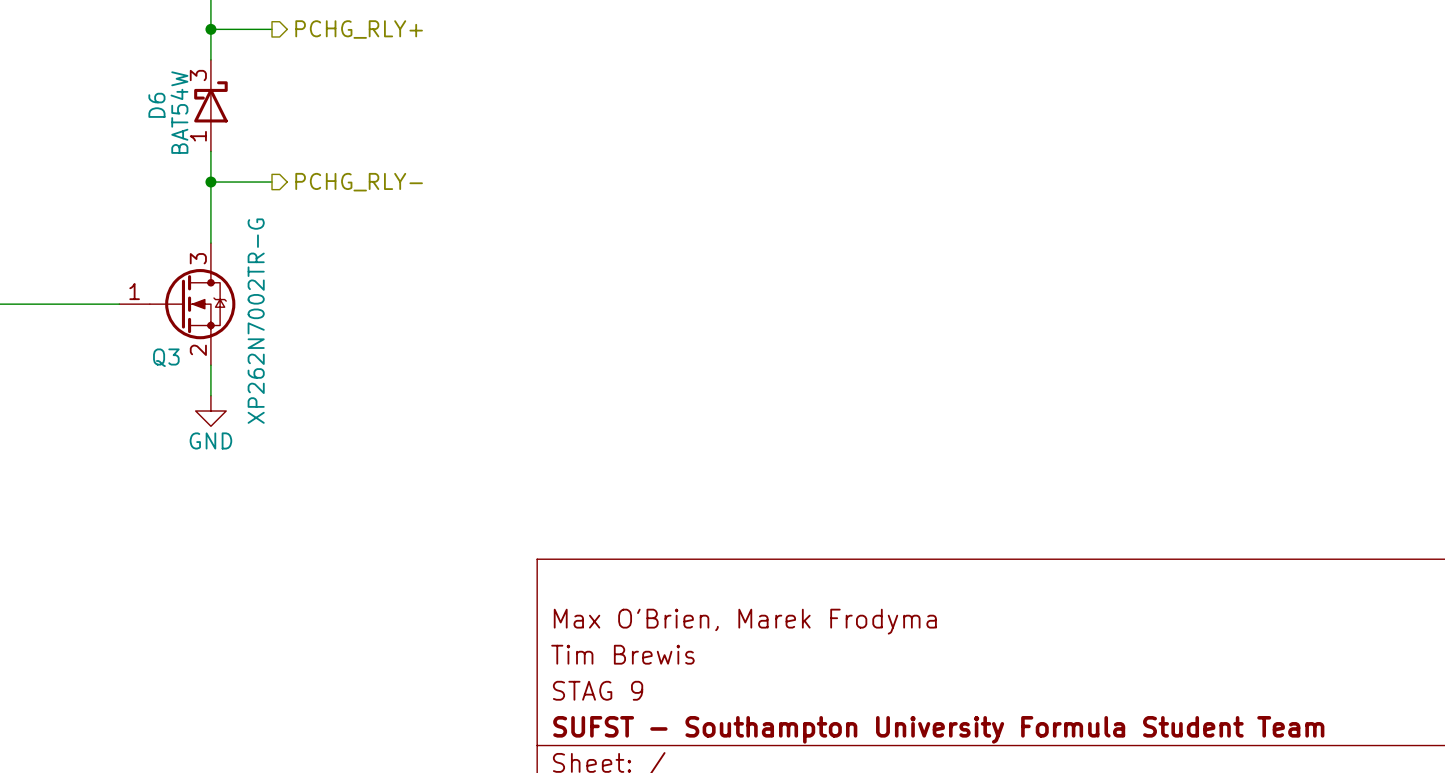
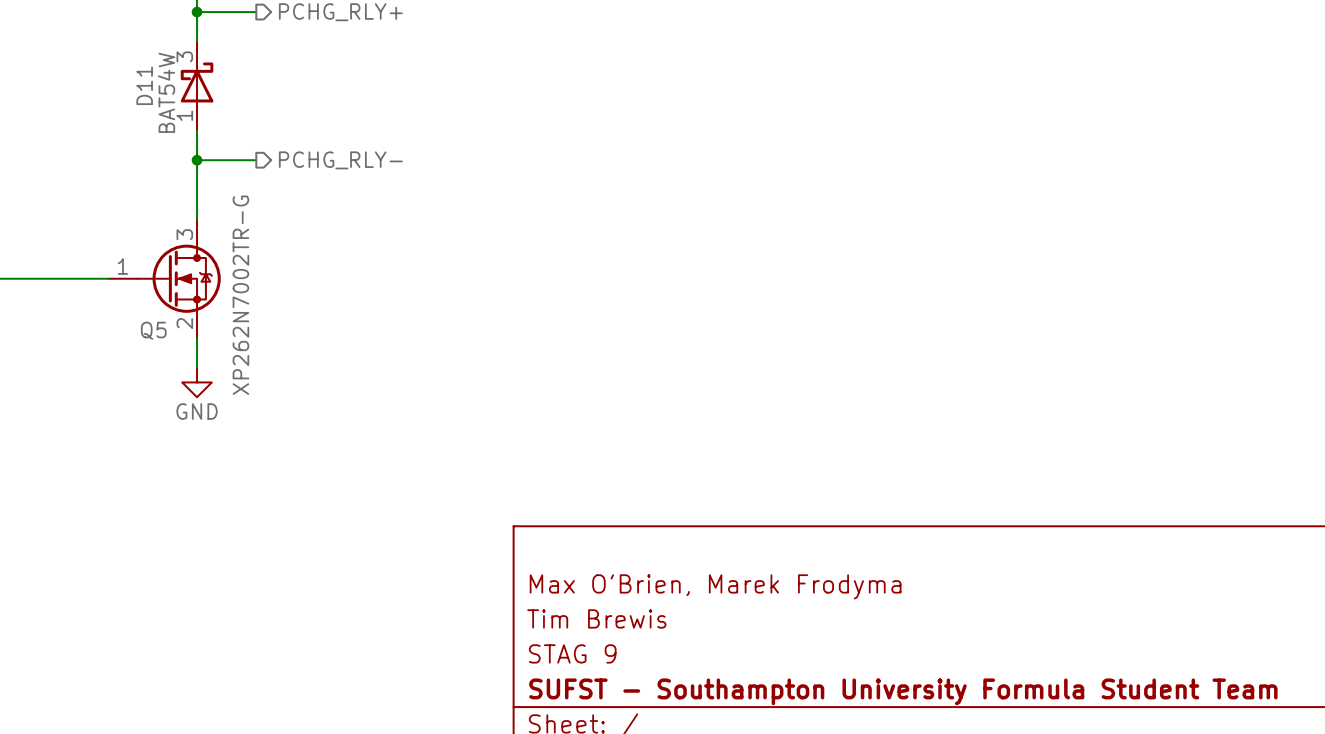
D6 name: D6 (156, 105) -> D11 (144, 85)
Q3 name: Q3 (166, 357) -> Q5 (153, 330)

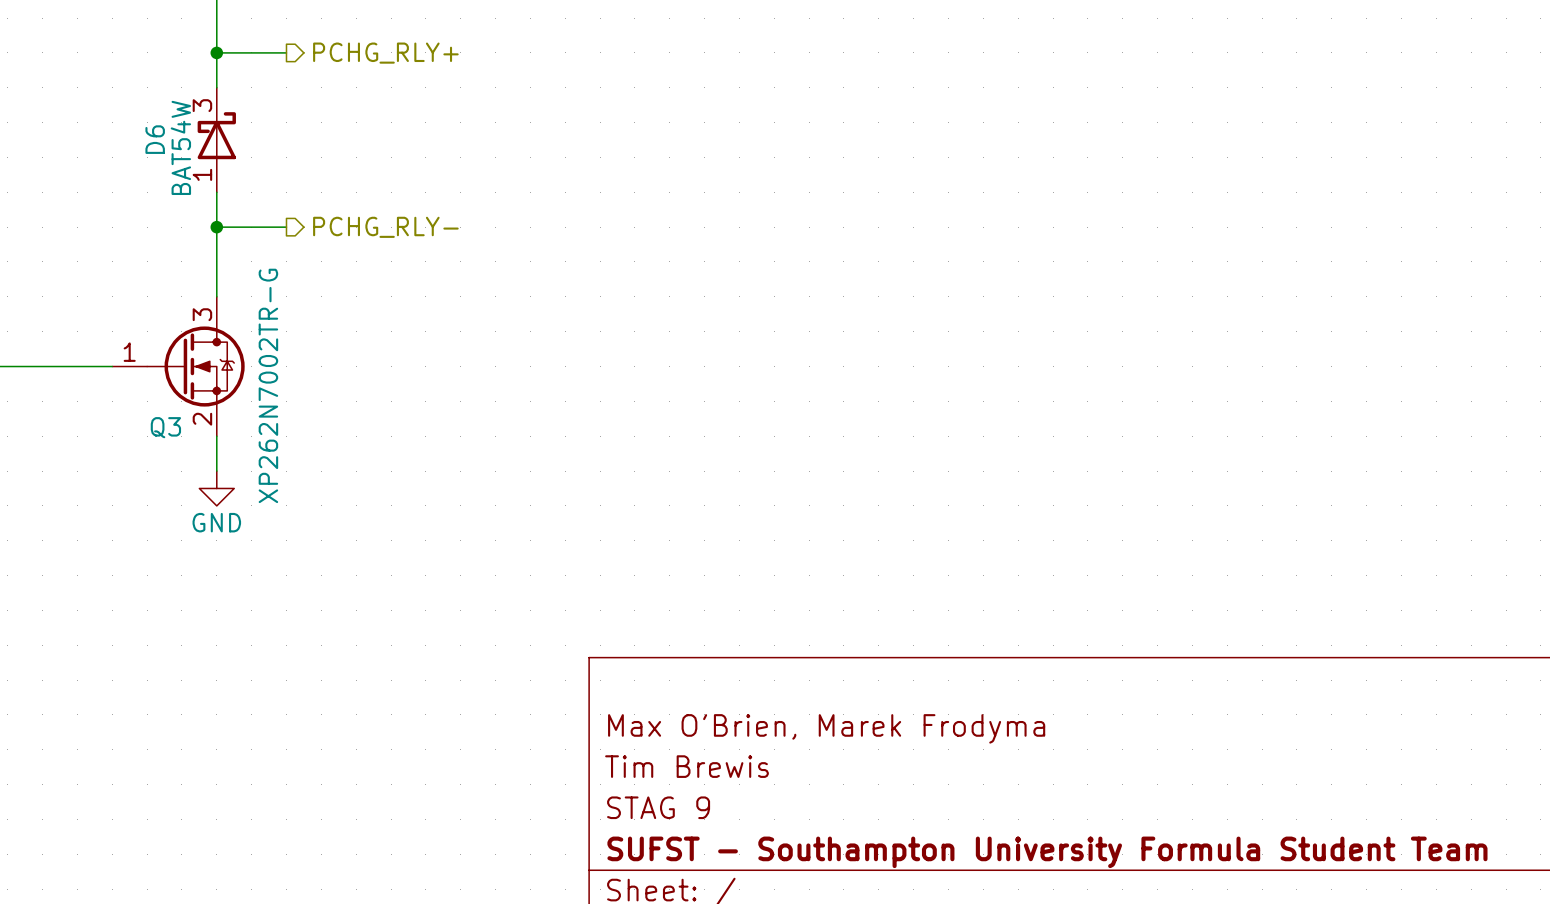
D11 name: D11 (144, 85) -> D6 (155, 139)
Q5 name: Q5 (153, 330) -> Q3 (165, 427)

